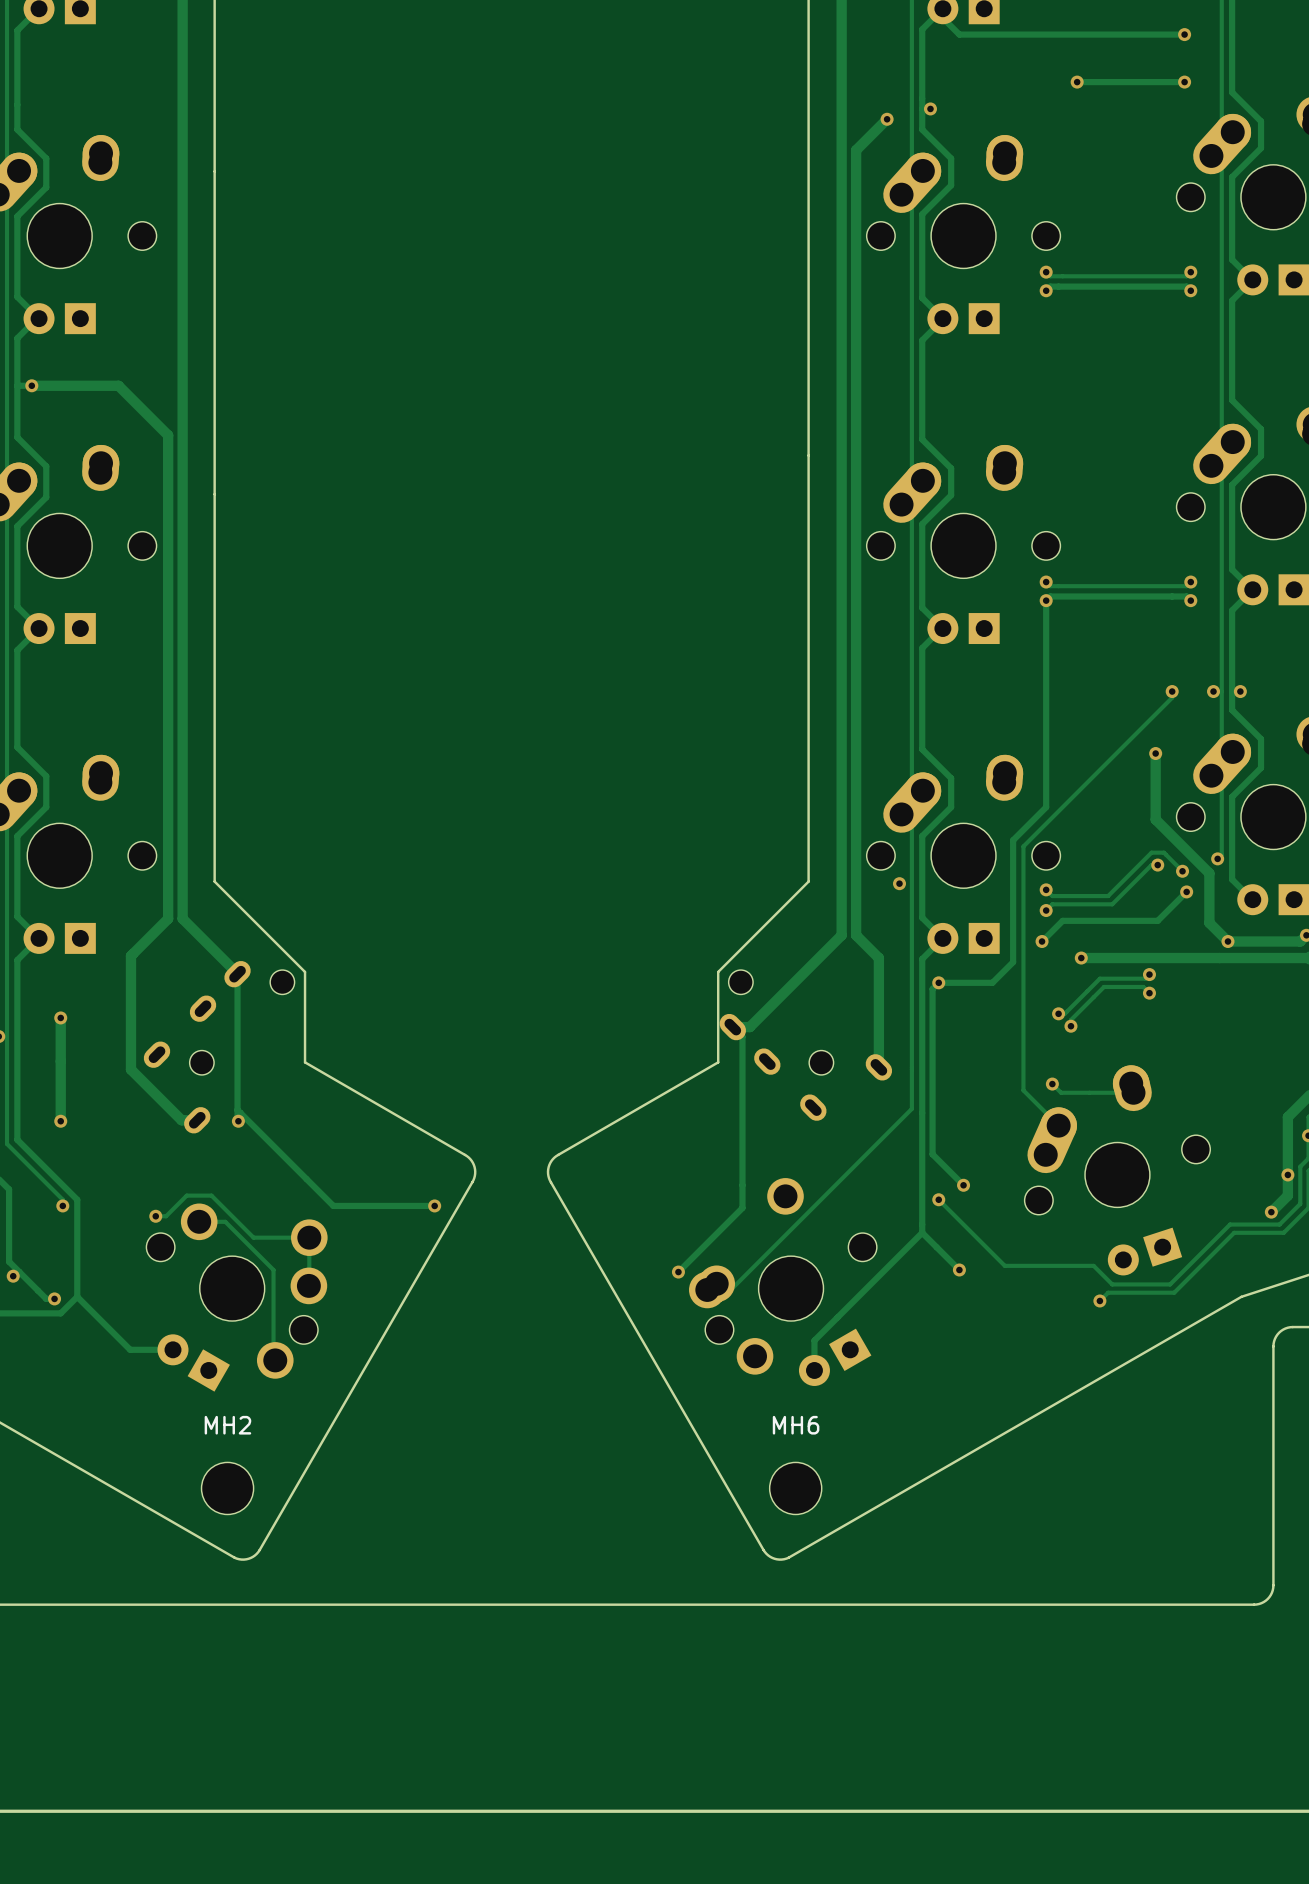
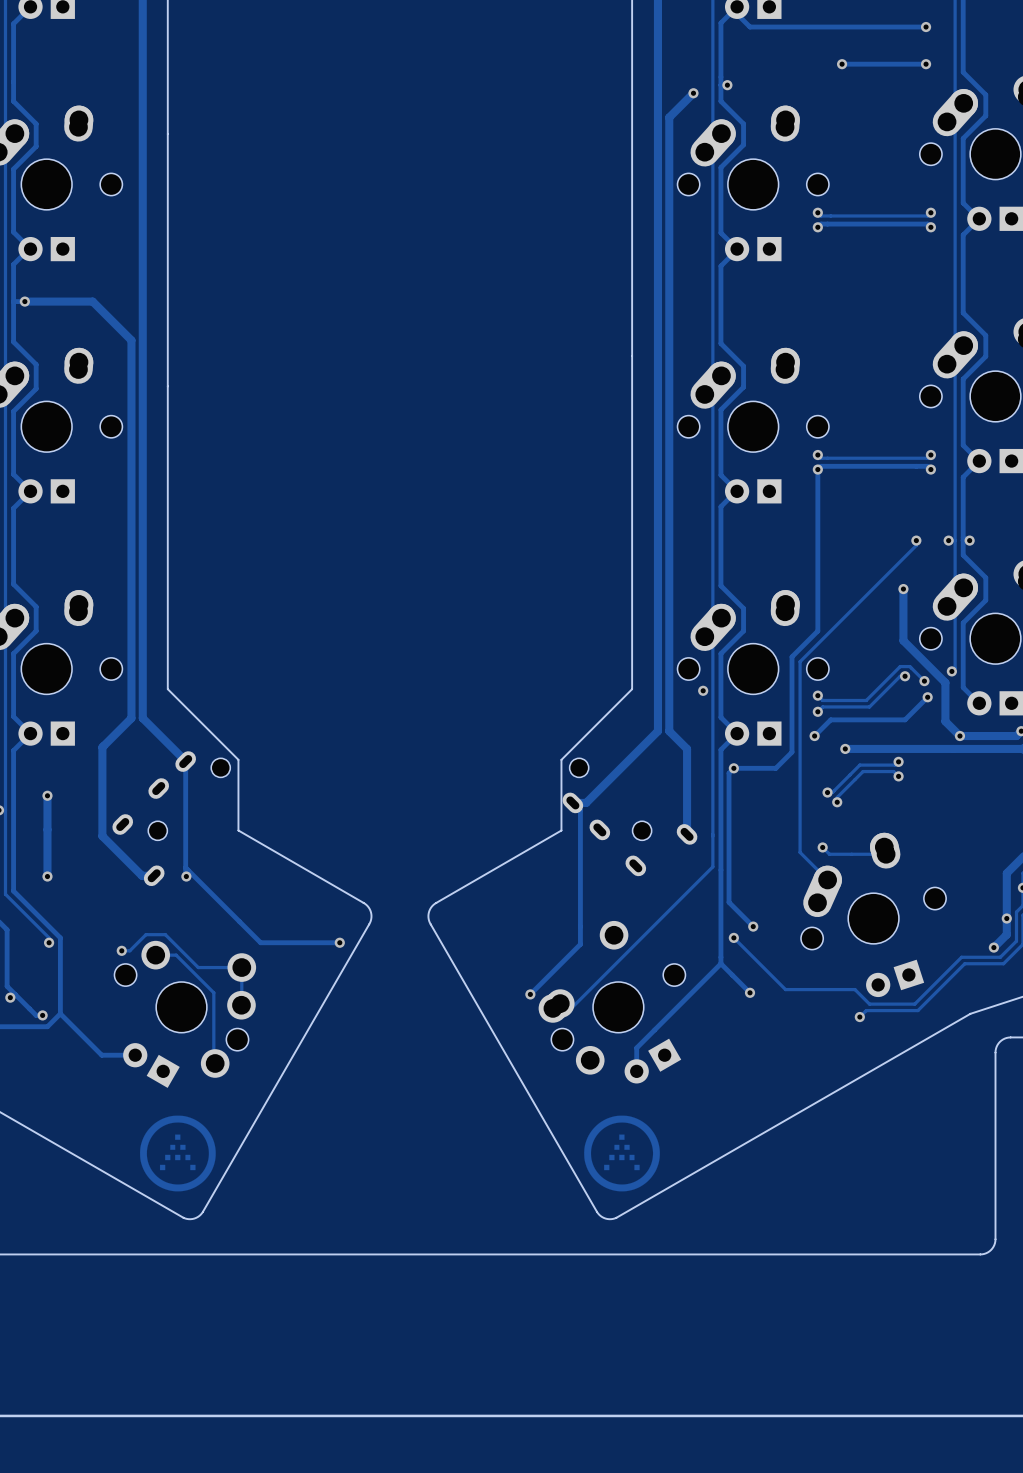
drawing: none -> [140, 1115, 216, 1192]
drawing: none -> [584, 1115, 660, 1192]
MH2: (227, 1488) -> none
MH6: (795, 1488) -> none

